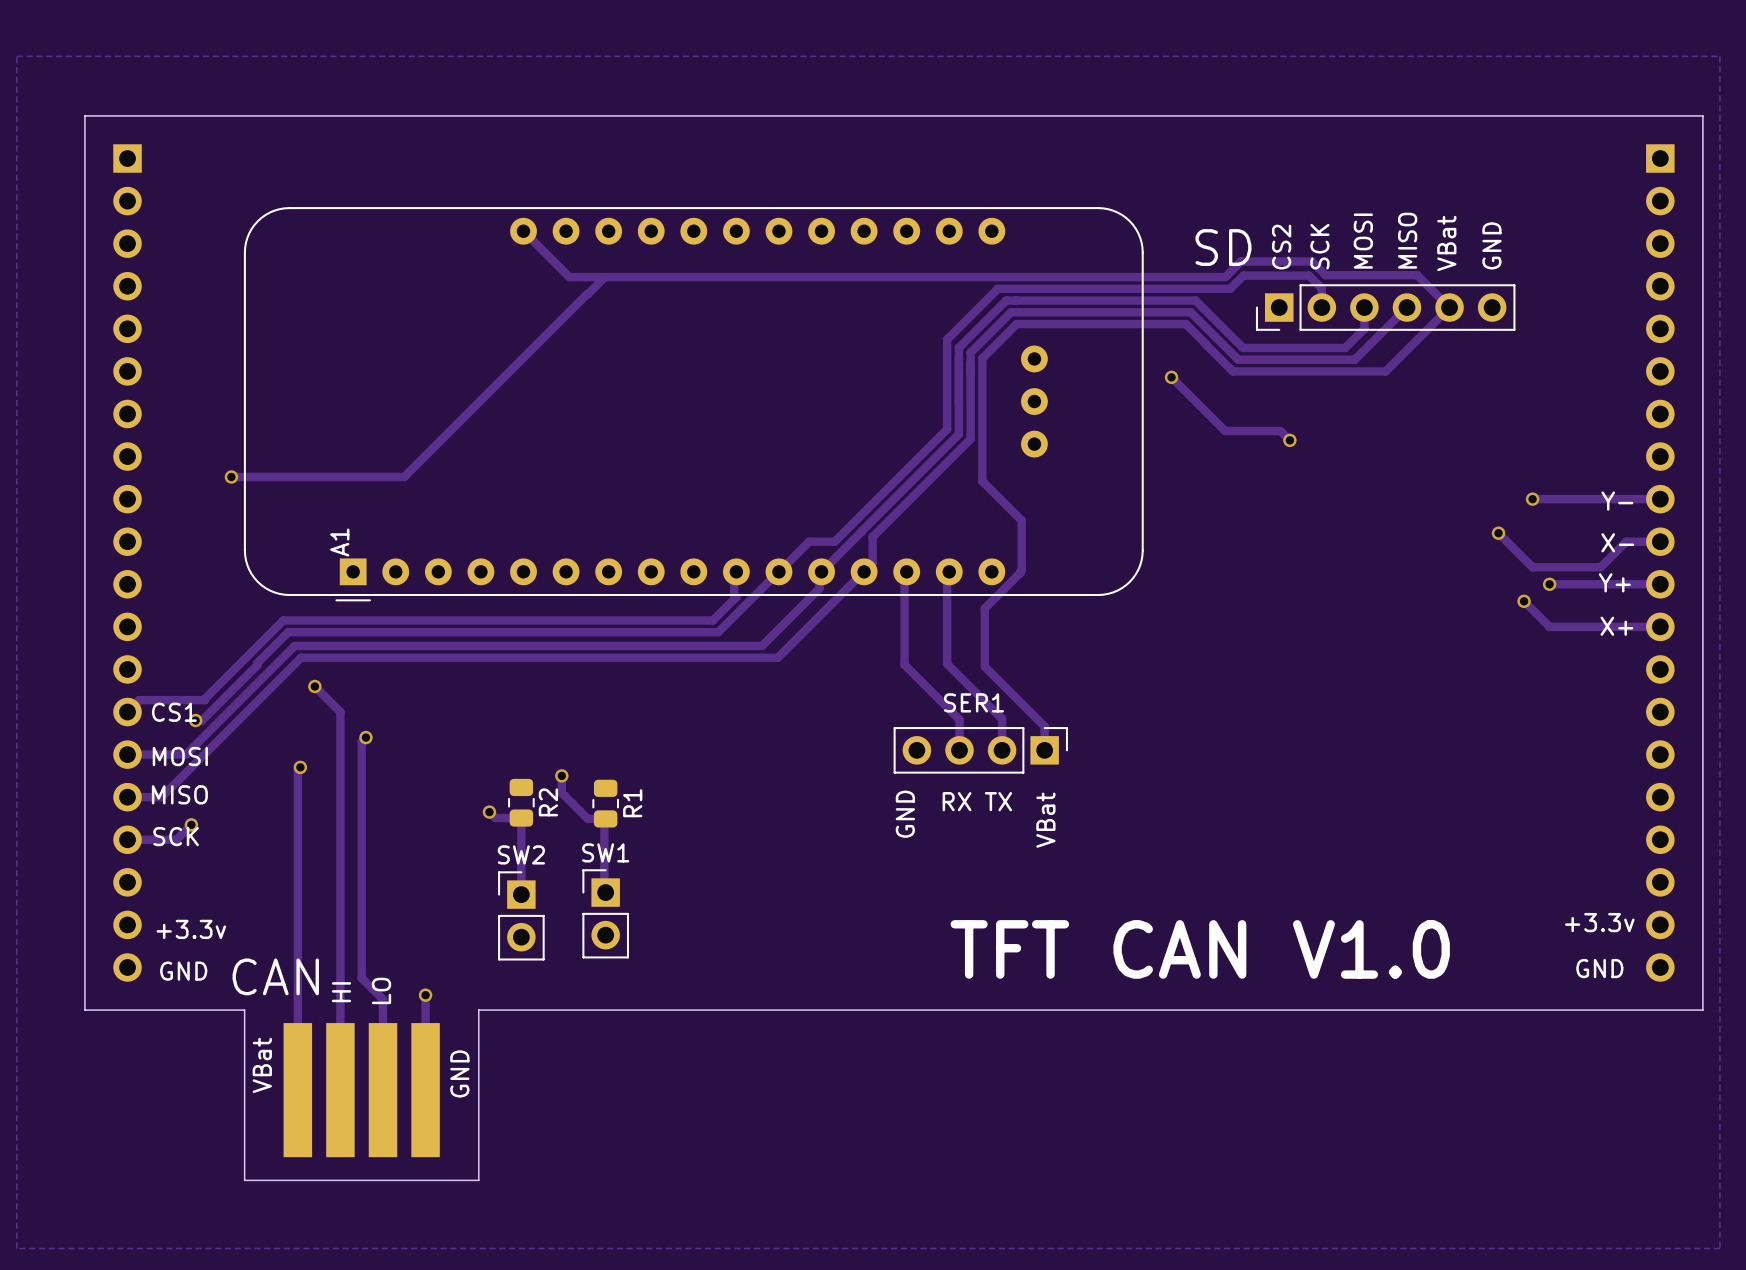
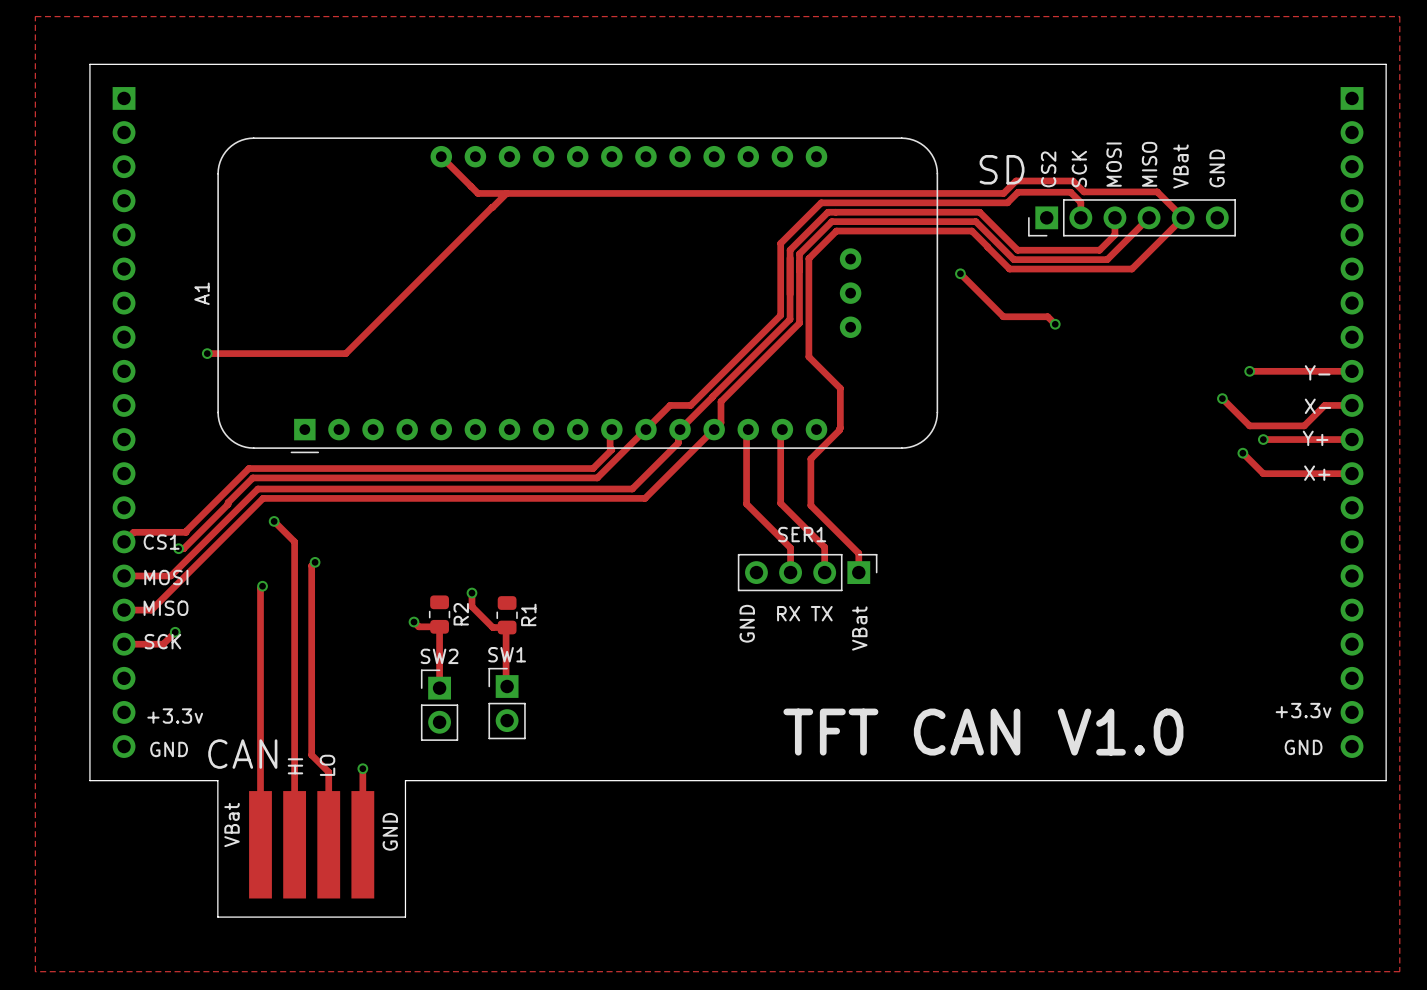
A1 name position: A1 (339, 542) -> A1 (202, 293)

